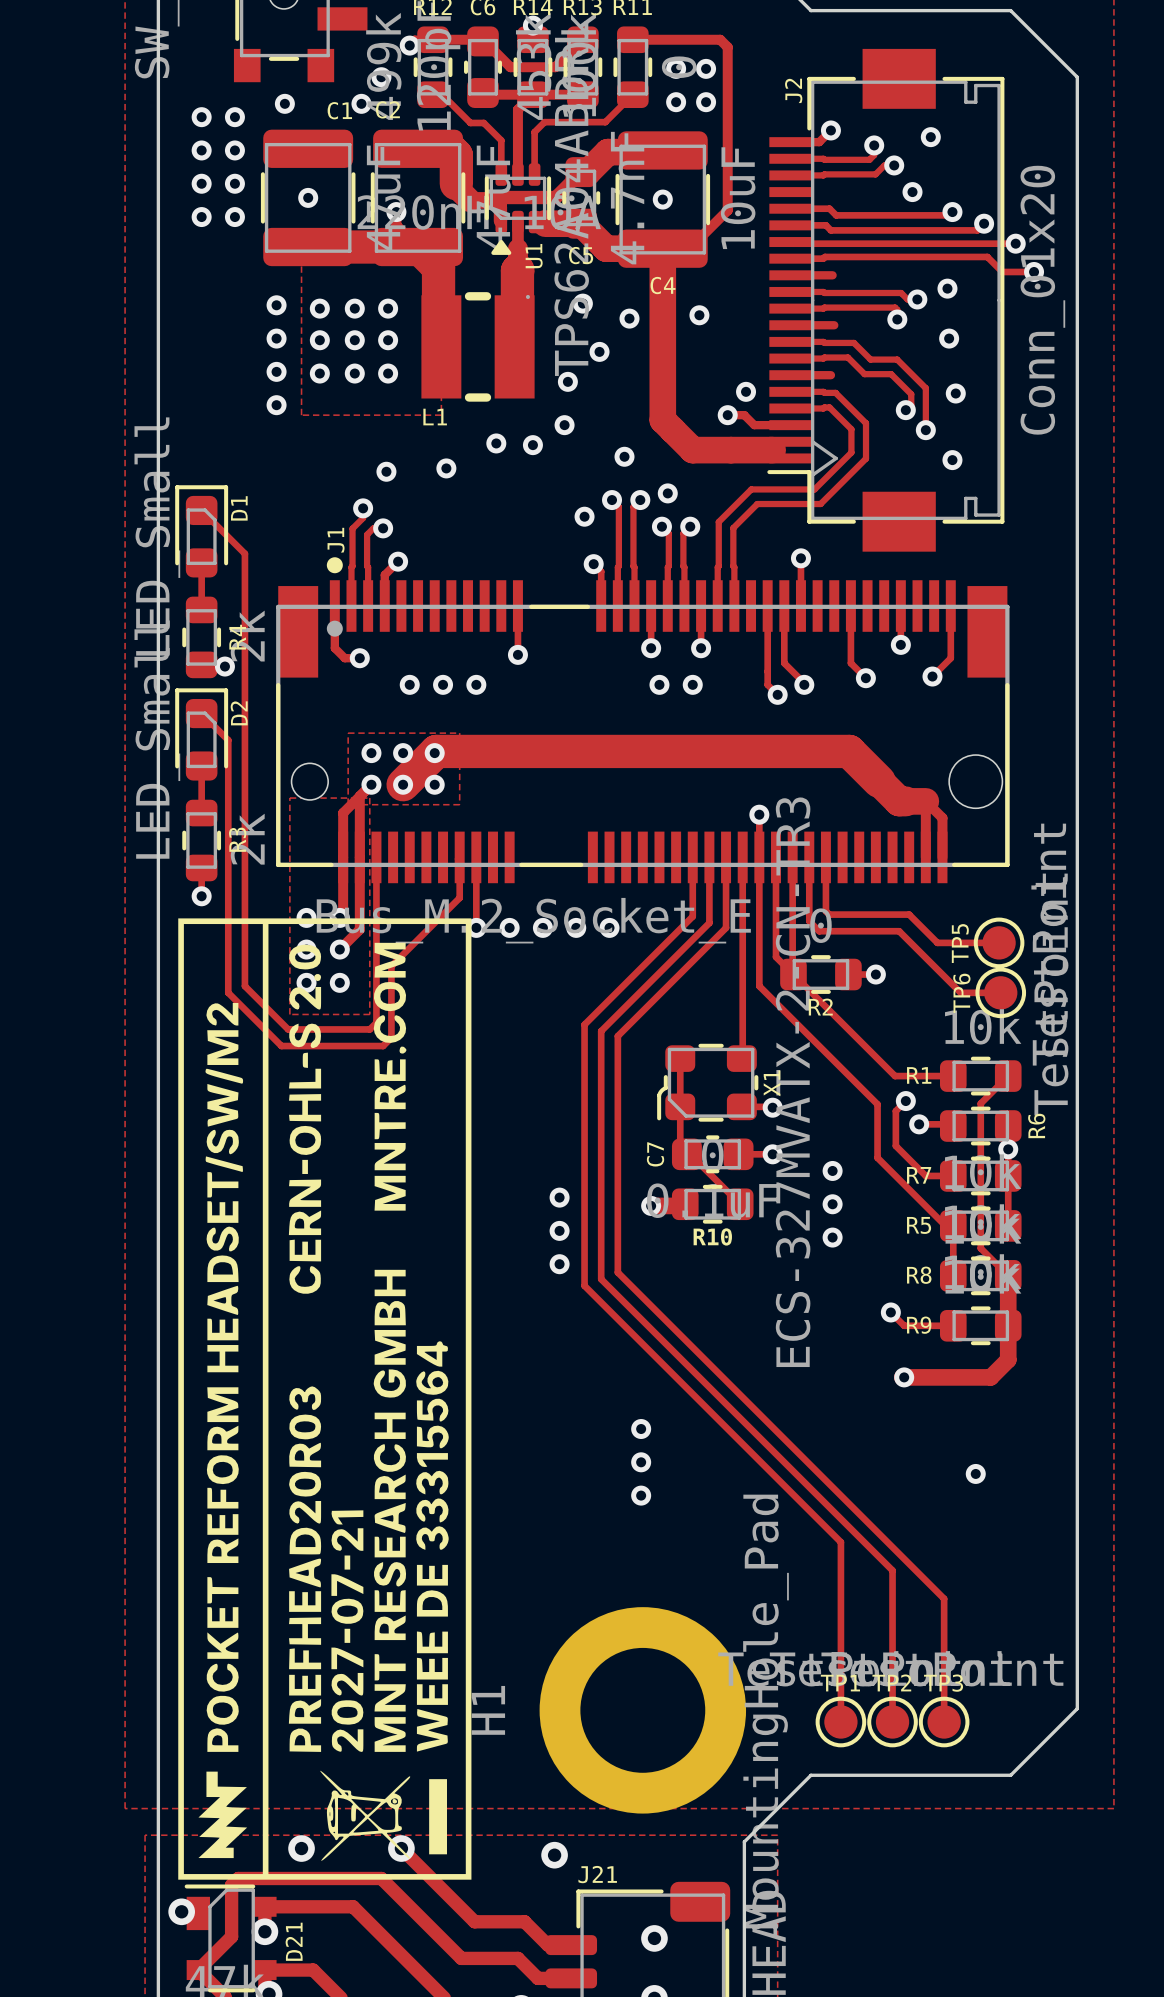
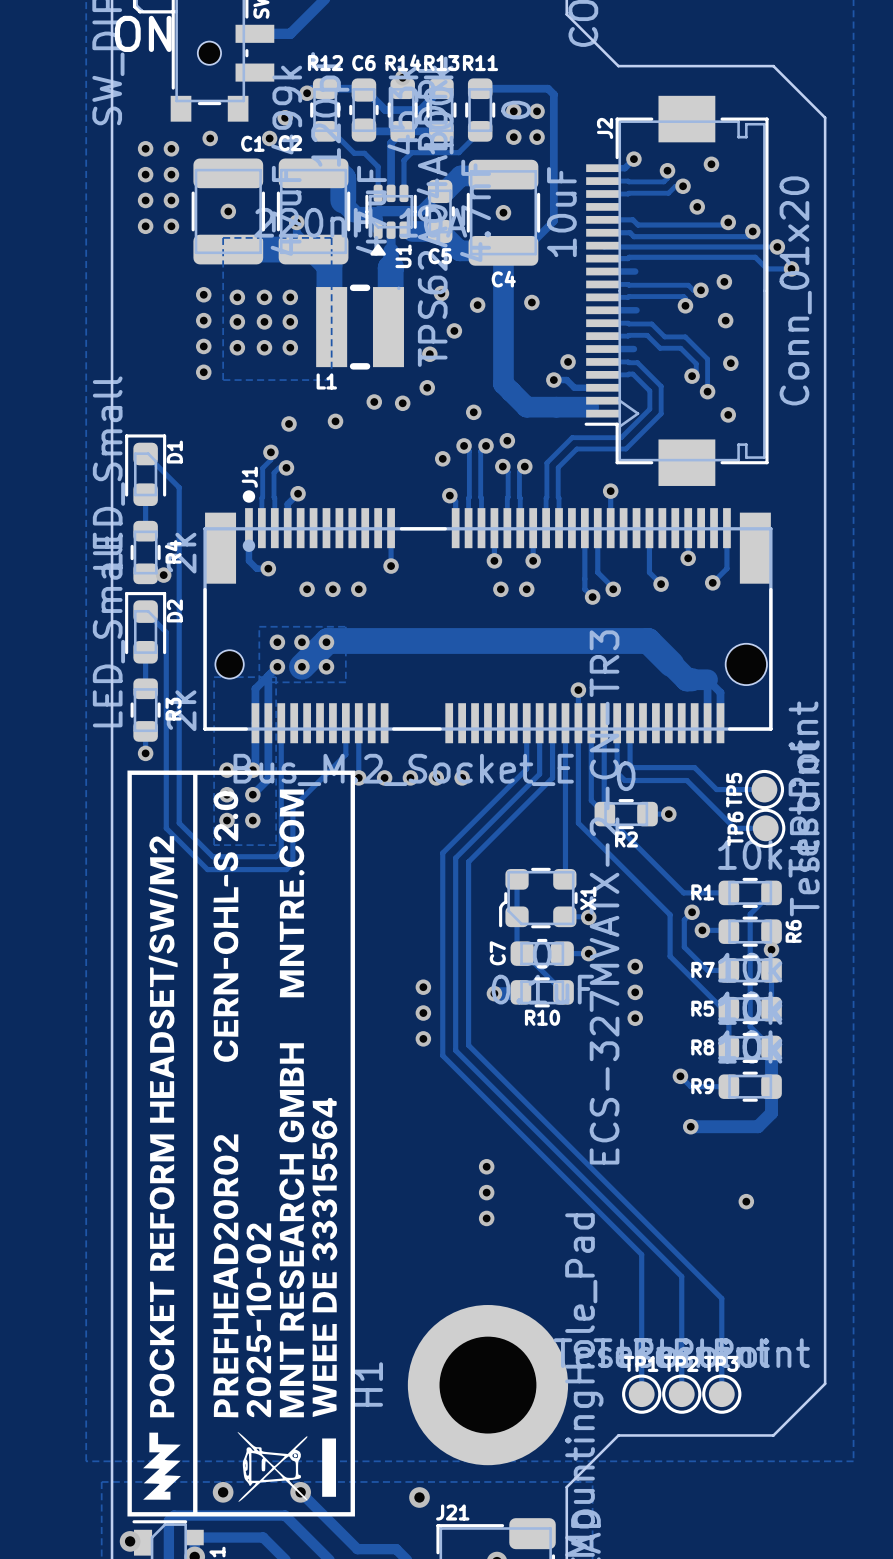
drawing shape: [178, 918, 472, 1880] -> [127, 770, 355, 1517]

